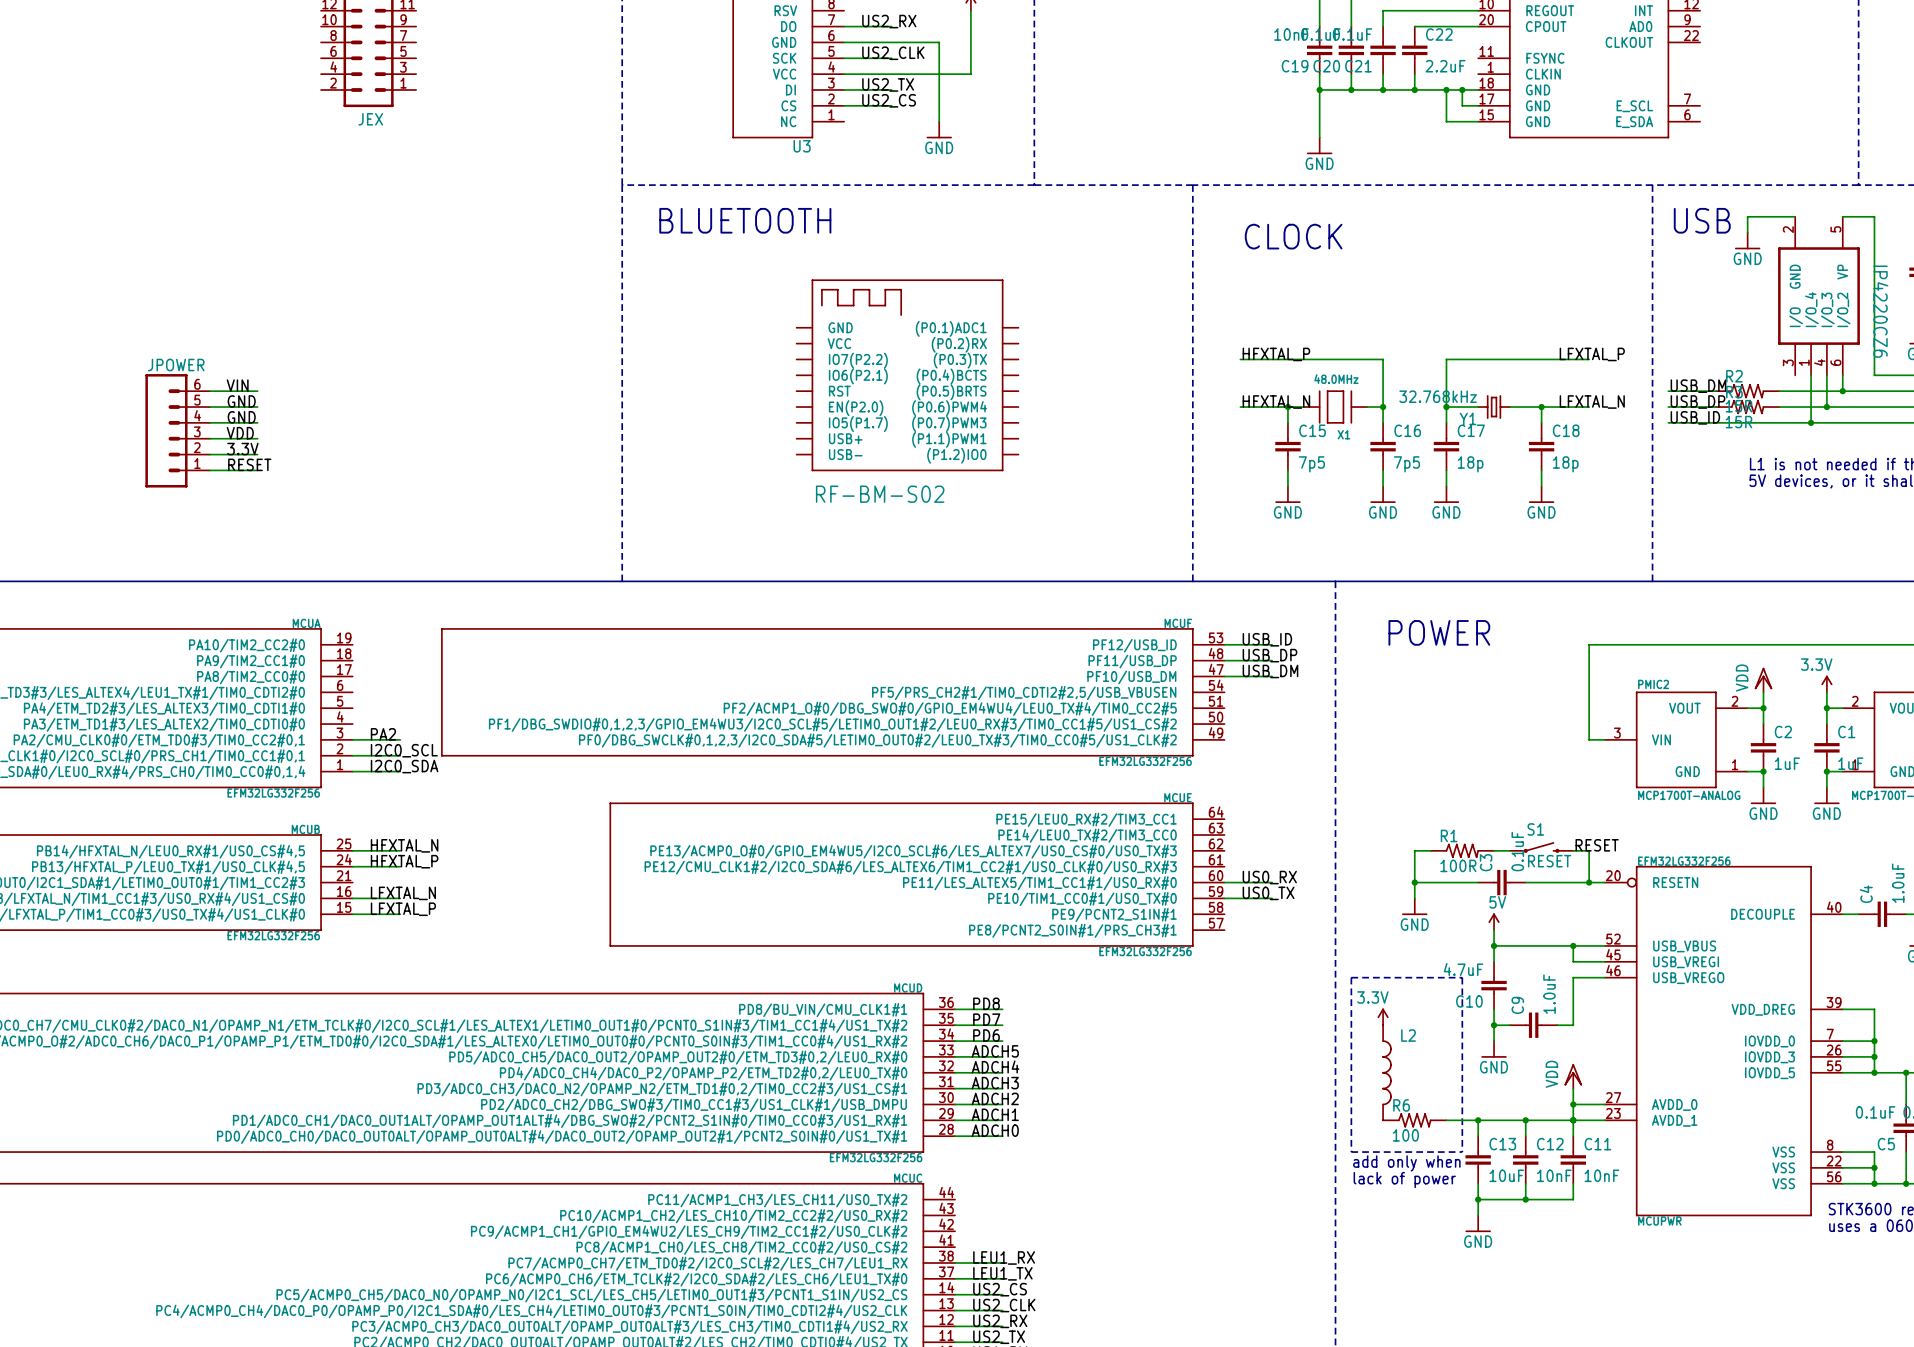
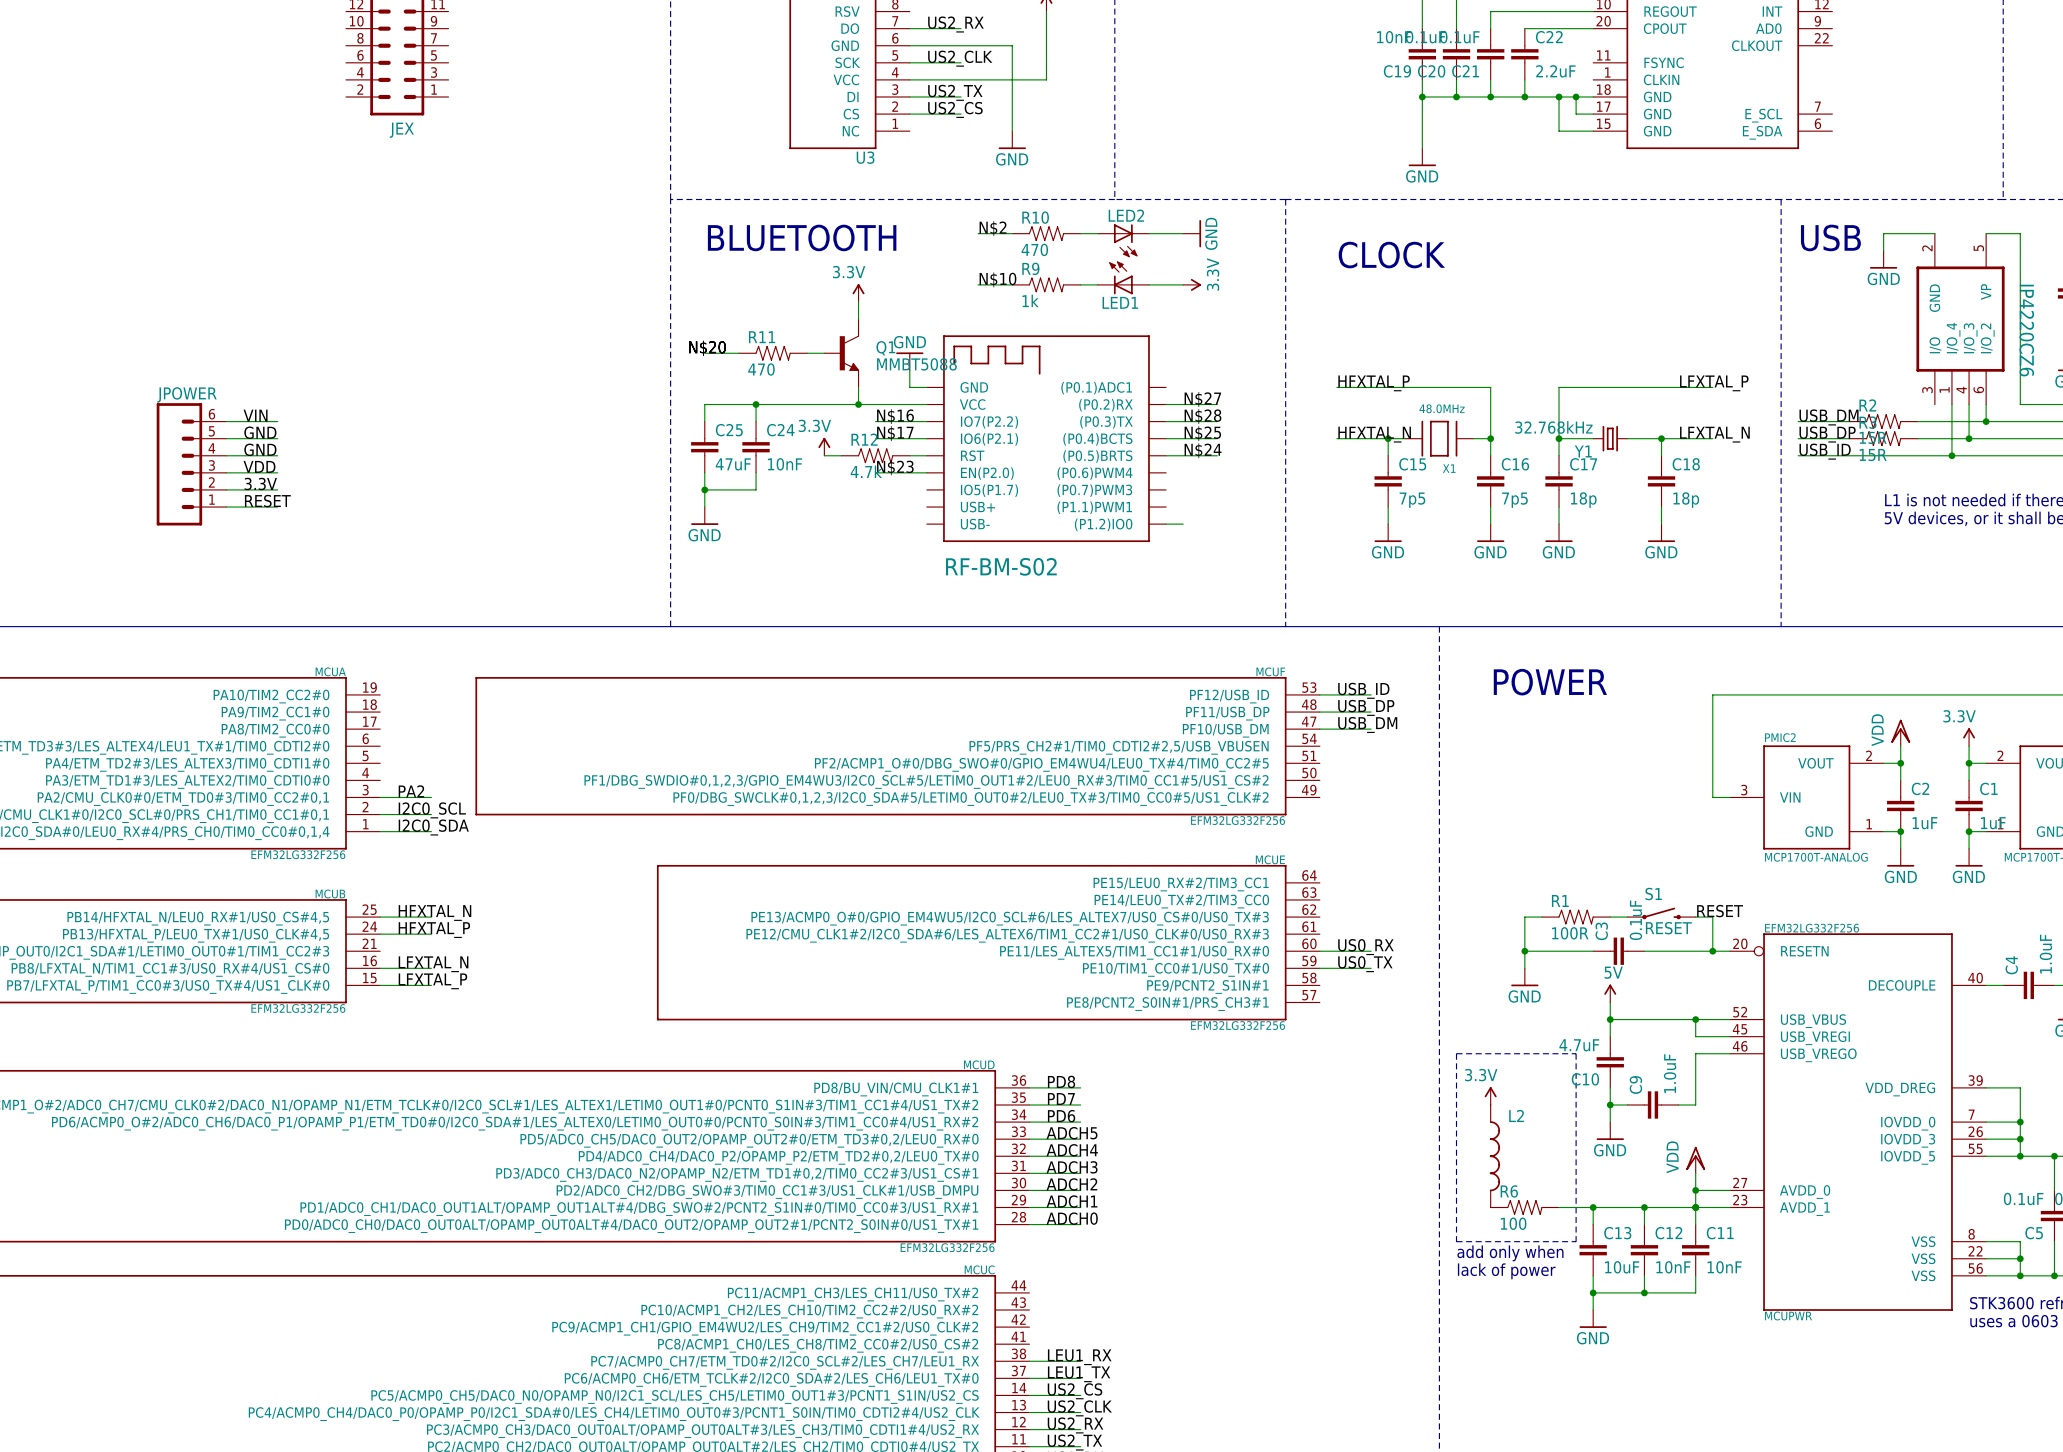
label: none -> N$2 (993, 228)
wire: none -> (978, 233) (1012, 233)
R10: none -> 470 (1046, 233)
wire: none -> (1080, 233) (1097, 233)
wire: none -> (1148, 233) (1183, 233)
power symbol: none -> GND (1192, 233)
LED2: none -> (1123, 240)
LED1: none -> (1123, 277)
label: none -> N$10 (997, 279)
wire: none -> (978, 284) (1012, 284)
R9: none -> 1k (1046, 284)
wire: none -> (1080, 284) (1097, 284)
wire: none -> (1148, 284) (1183, 284)
power symbol: none -> 3.3V (1192, 284)
power symbol: none -> 3.3V (858, 293)
wire: none -> (858, 302) (858, 319)
label: none -> N$20 (707, 348)
wire: none -> (704, 353) (738, 353)
R11: none -> 470 (773, 353)
wire: none -> (807, 353) (824, 353)
Q1: none -> MMBT5088 (841, 353)
power symbol: none -> GND (909, 361)
wire: none -> (909, 370) (909, 387) (926, 387)
wire: none -> (858, 387) (858, 404)
label: none -> N$27 (1202, 399)
wire: none -> (756, 404) (756, 421)
junction: none -> (756, 404)
junction: none -> (858, 404)
wire: none -> (926, 404) (704, 404) (704, 421)
part position: (907, 375) -> (1046, 438)
wire: none -> (1166, 404) (1217, 404)
label: none -> N$16 (895, 416)
label: none -> N$28 (1202, 416)
wire: none -> (875, 421) (926, 421)
wire: none -> (1166, 421) (1217, 421)
label: none -> N$17 (895, 433)
label: none -> N$25 (1202, 433)
wire: none -> (875, 438) (926, 438)
wire: none -> (1166, 438) (1217, 438)
C25: none -> 47uF (704, 447)
C24: none -> 10nF (756, 447)
power symbol: none -> 3.3V (824, 446)
label: none -> N$24 (1203, 450)
wire: none -> (824, 455) (841, 455)
R12: none -> 4.7k (875, 455)
wire: none -> (909, 455) (926, 455)
wire: none -> (1166, 455) (1217, 455)
label: none -> N$23 (895, 467)
wire: none -> (704, 472) (704, 507)
wire: none -> (756, 472) (756, 489) (704, 489)
wire: none -> (875, 472) (926, 472)
junction: none -> (704, 489)
power symbol: none -> GND (704, 515)
wire: none -> (1166, 524) (1183, 524)

